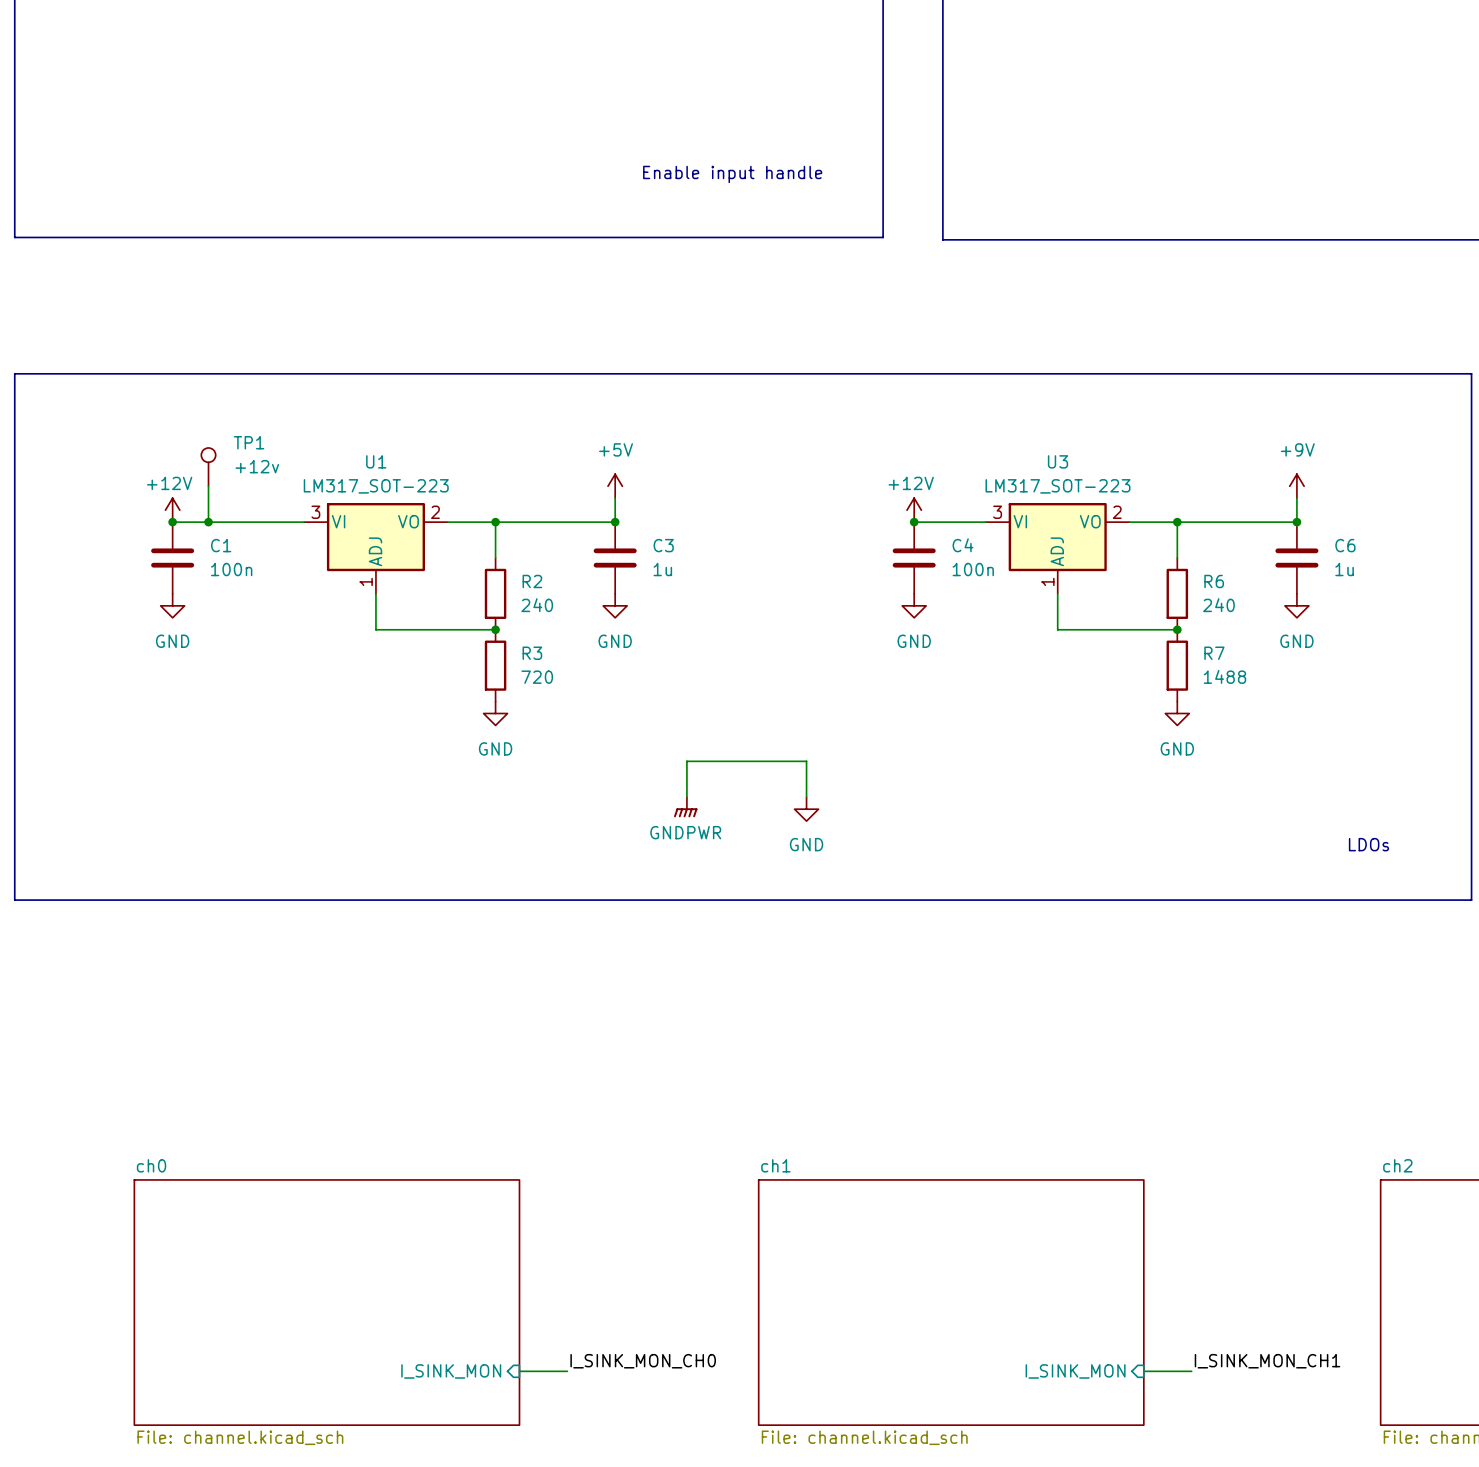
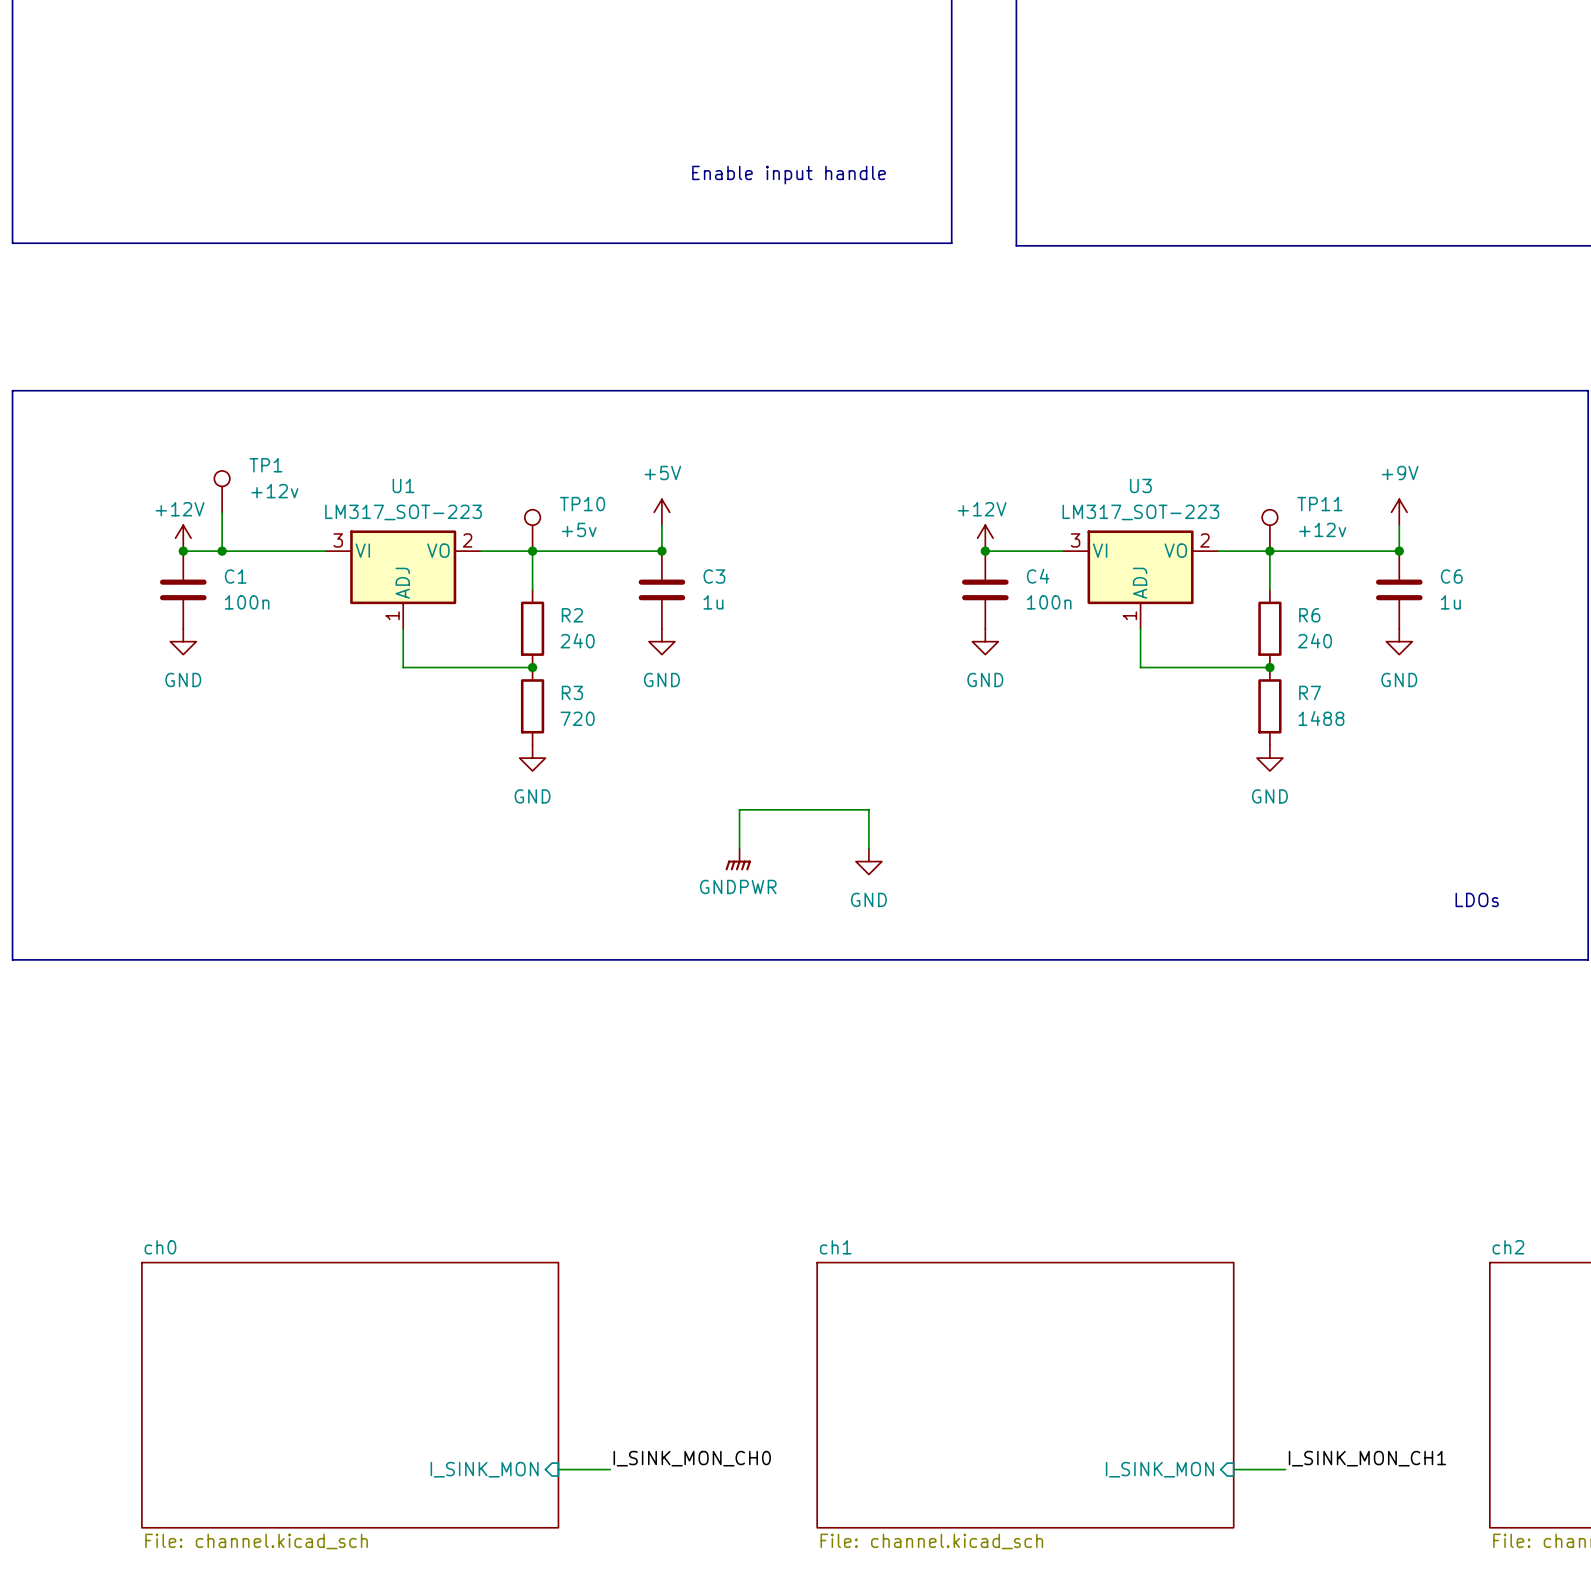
TP10: none -> +5v (532, 530)
TP11: none -> +12v (1269, 530)

